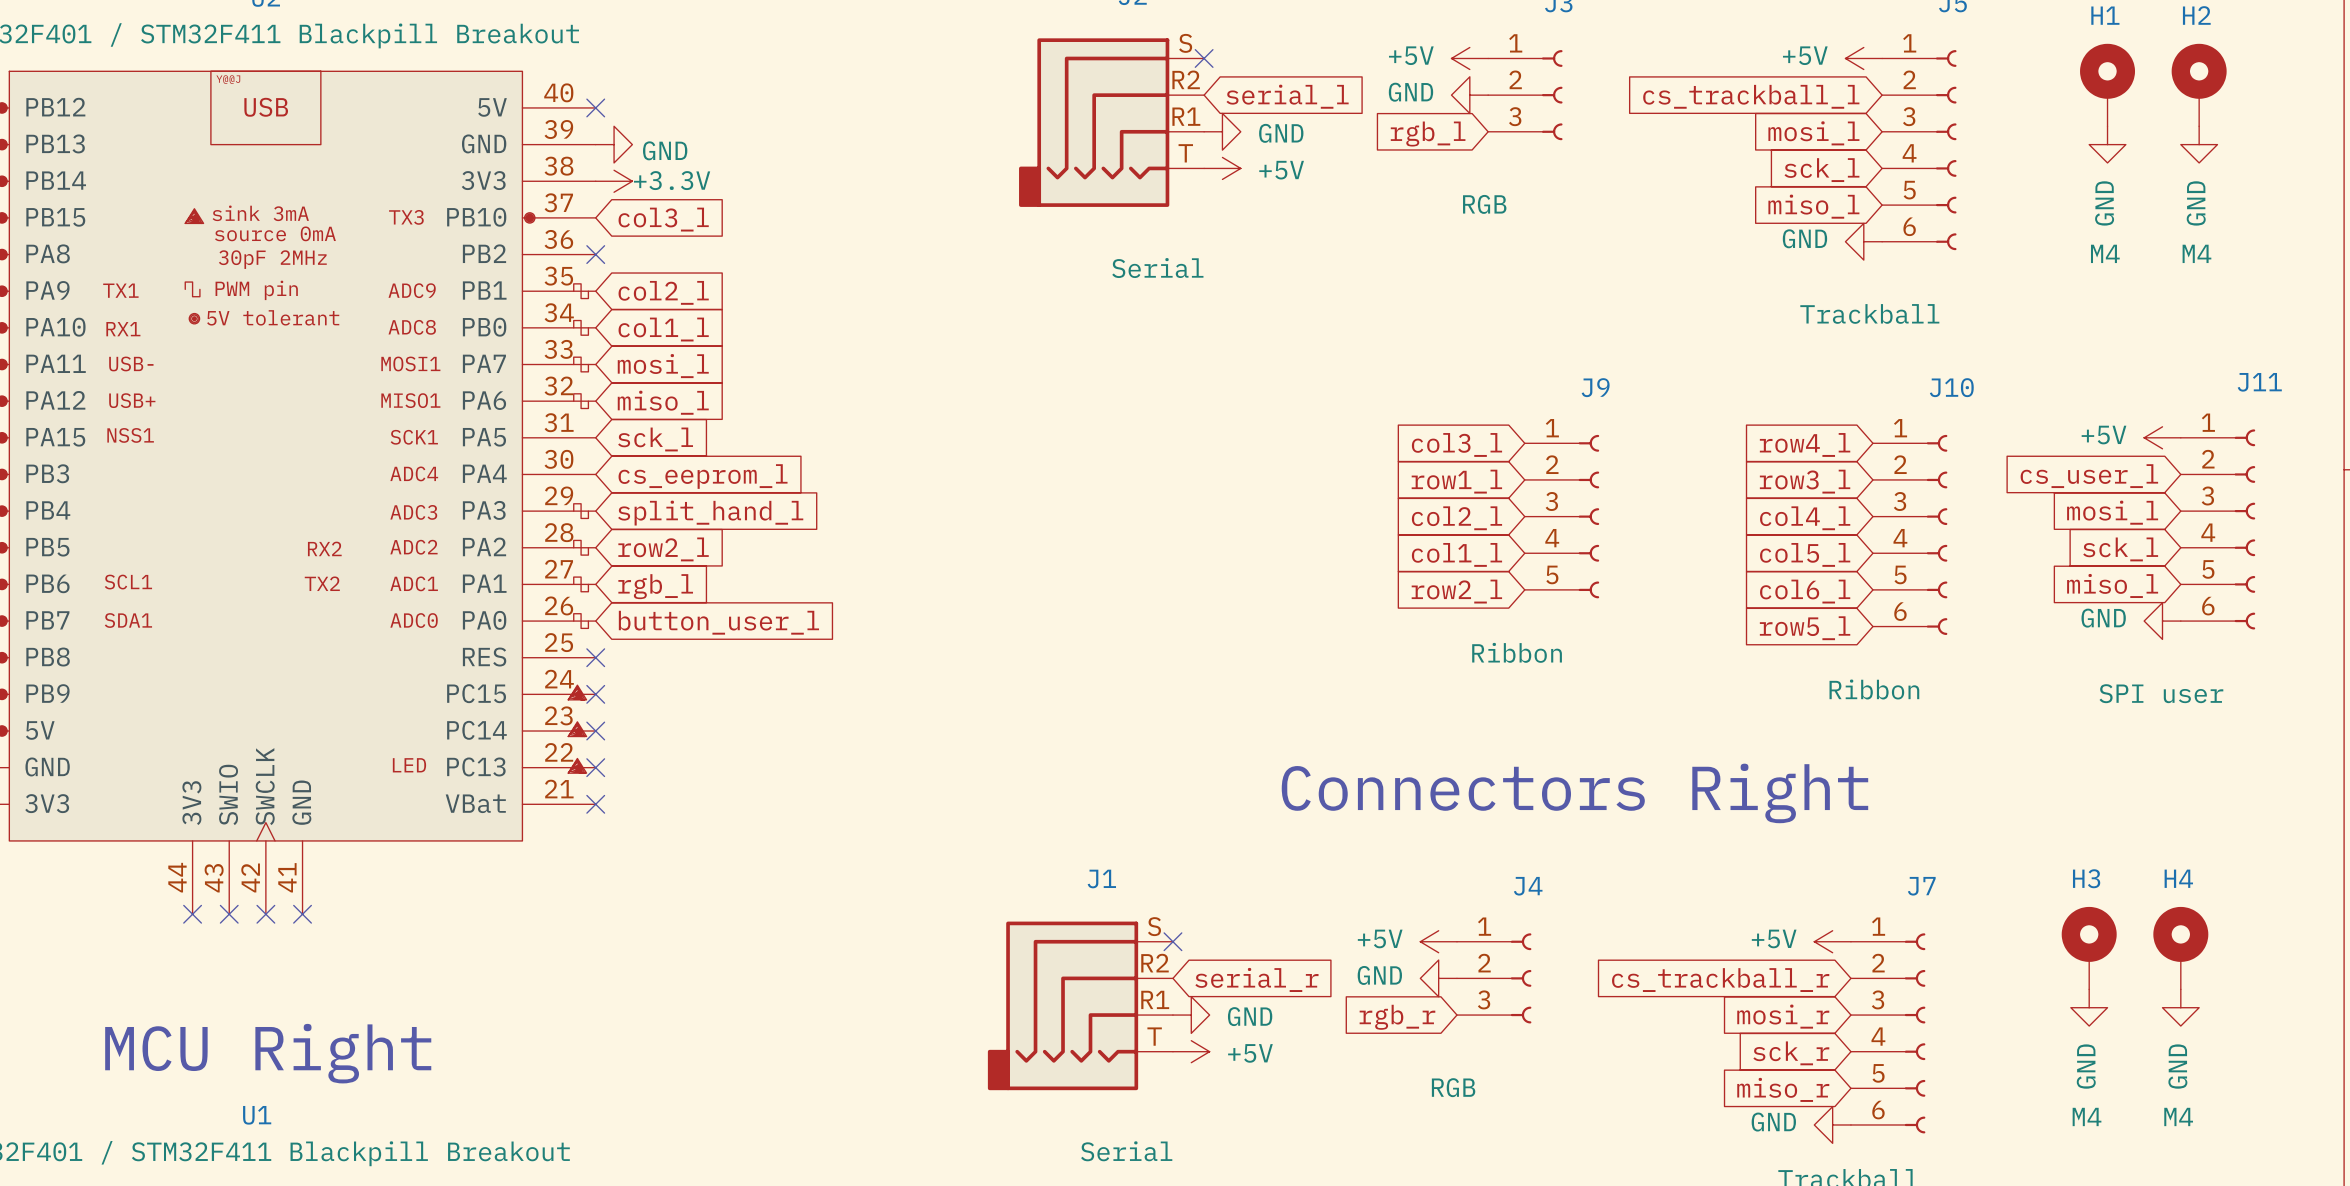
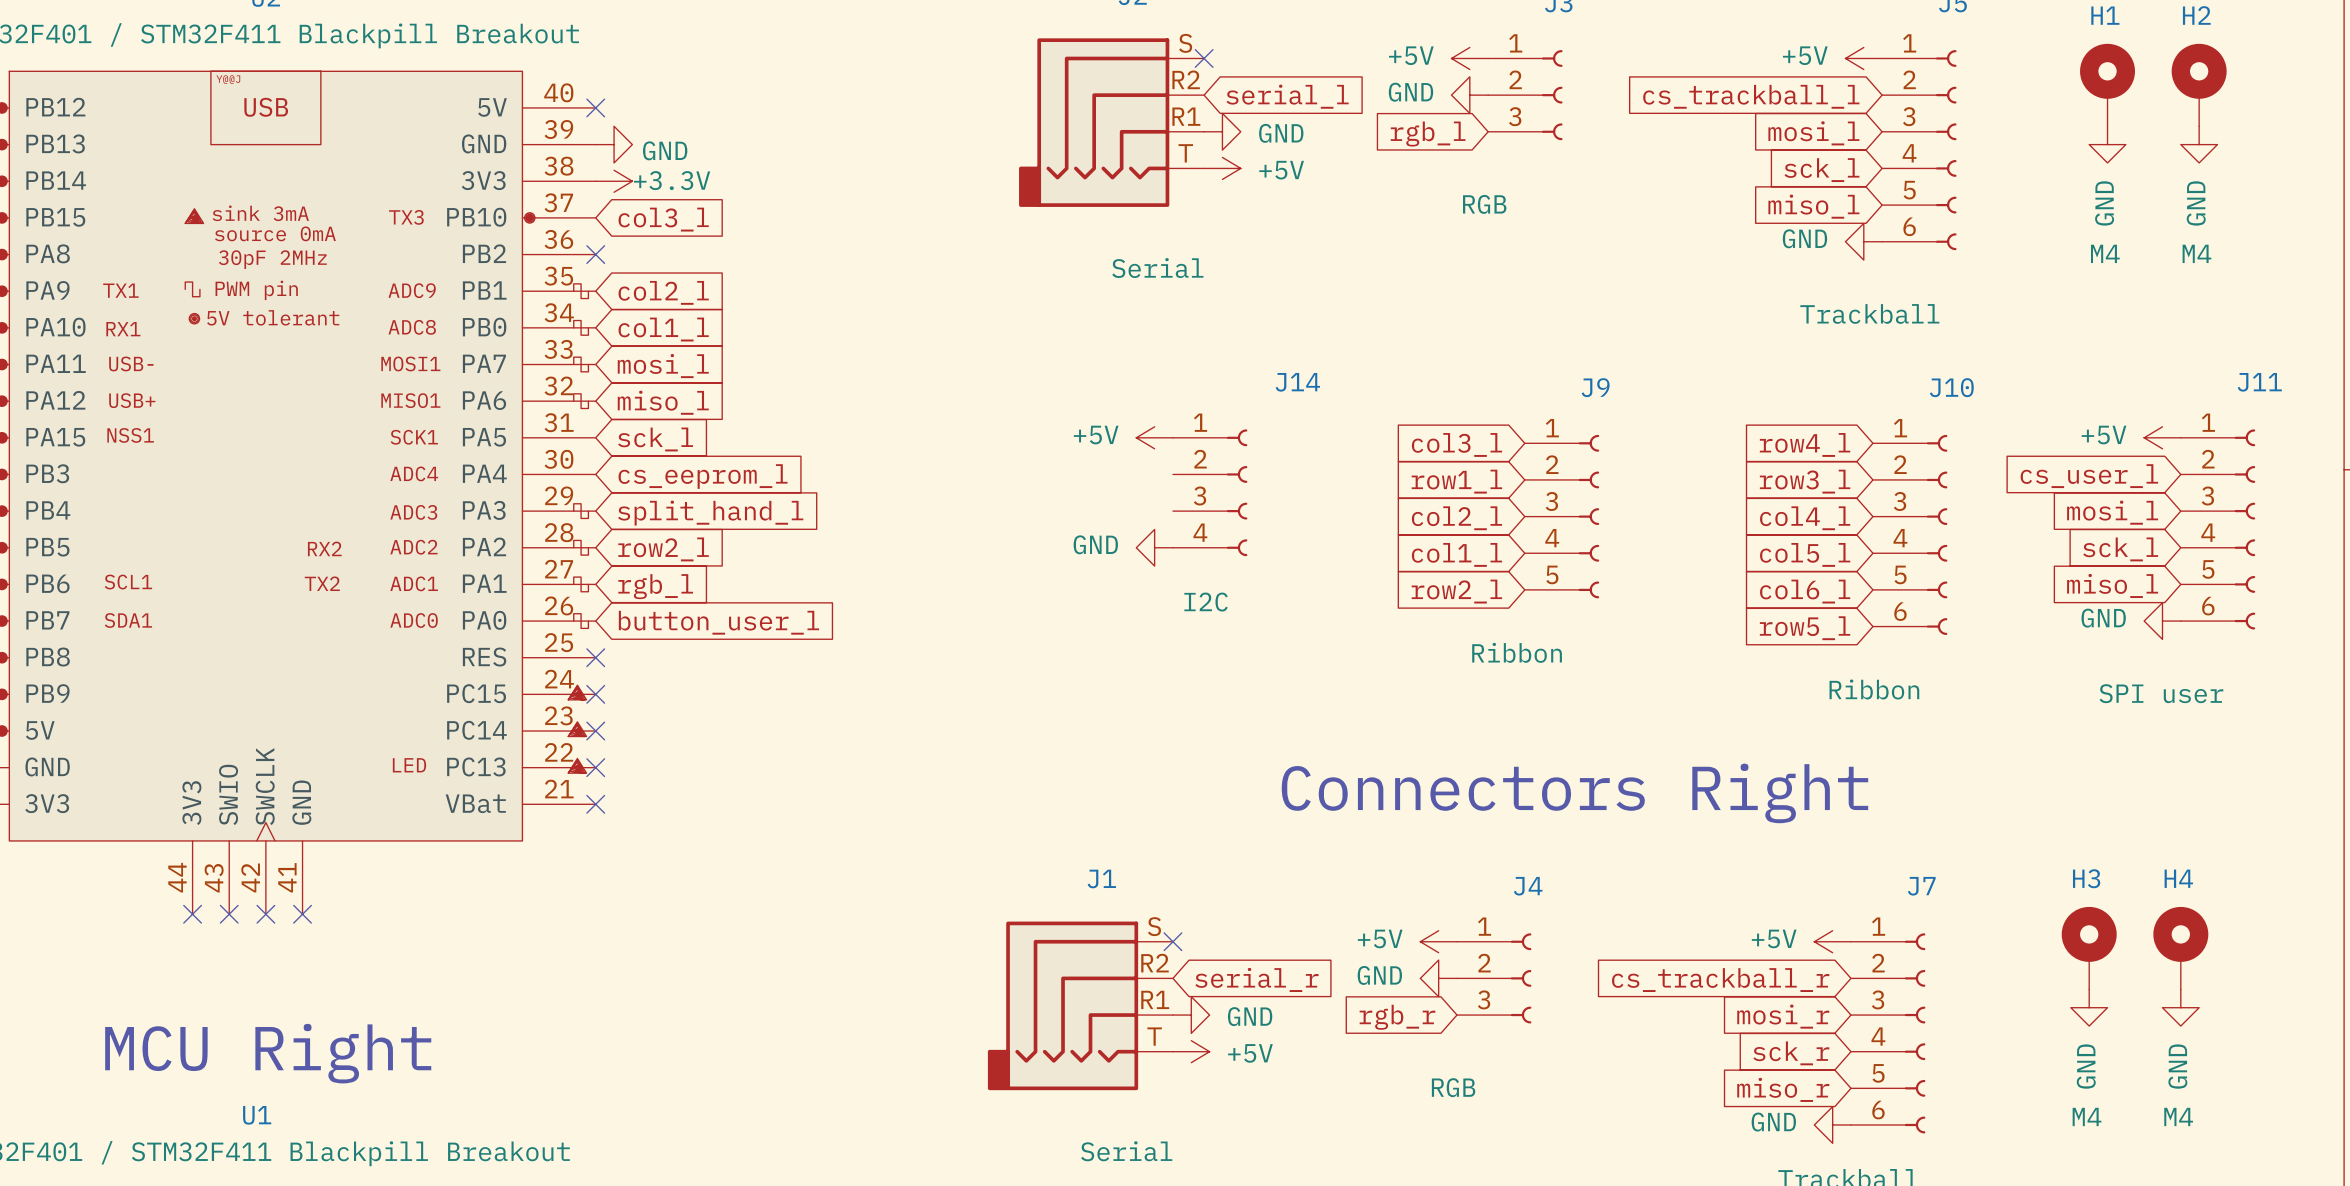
power symbol: none -> +5V (1154, 437)
J14: none -> I2C (1210, 492)
power symbol: none -> GND (1154, 547)

